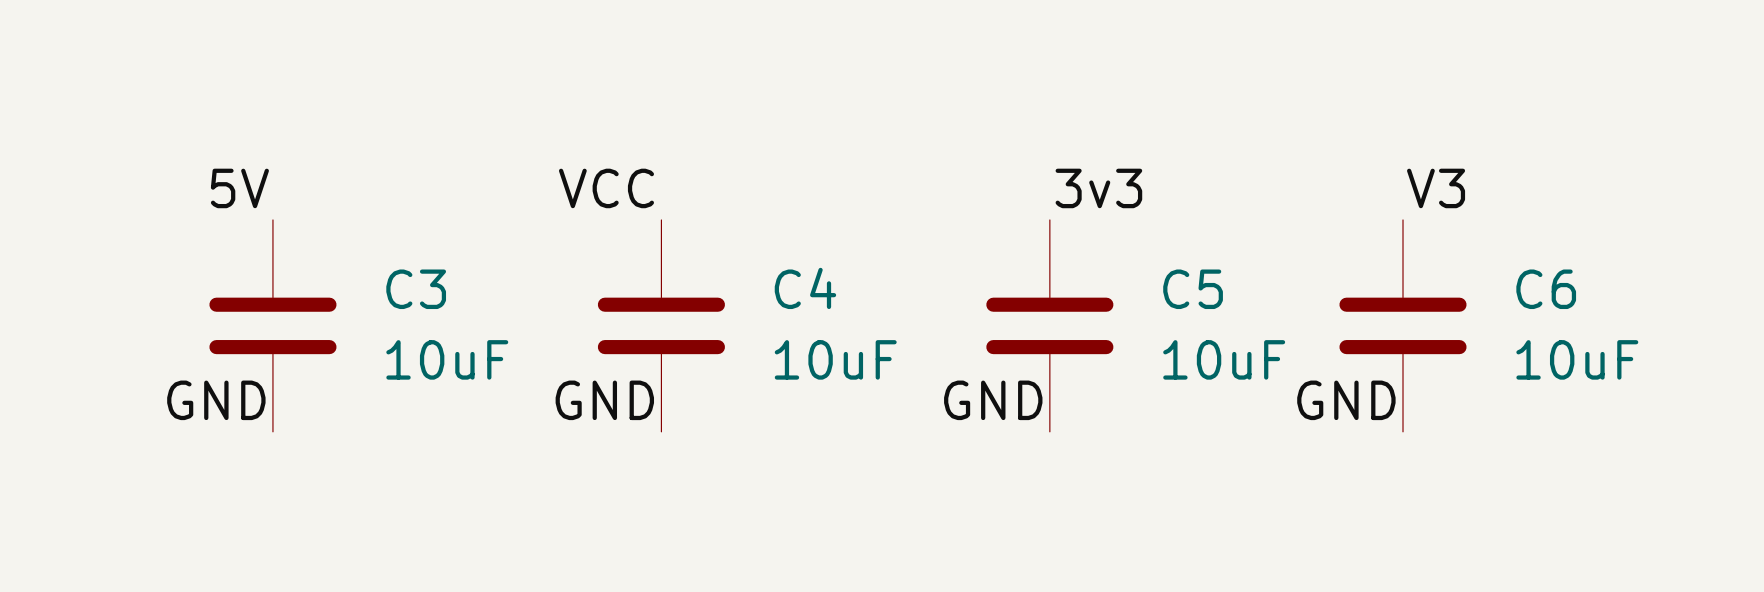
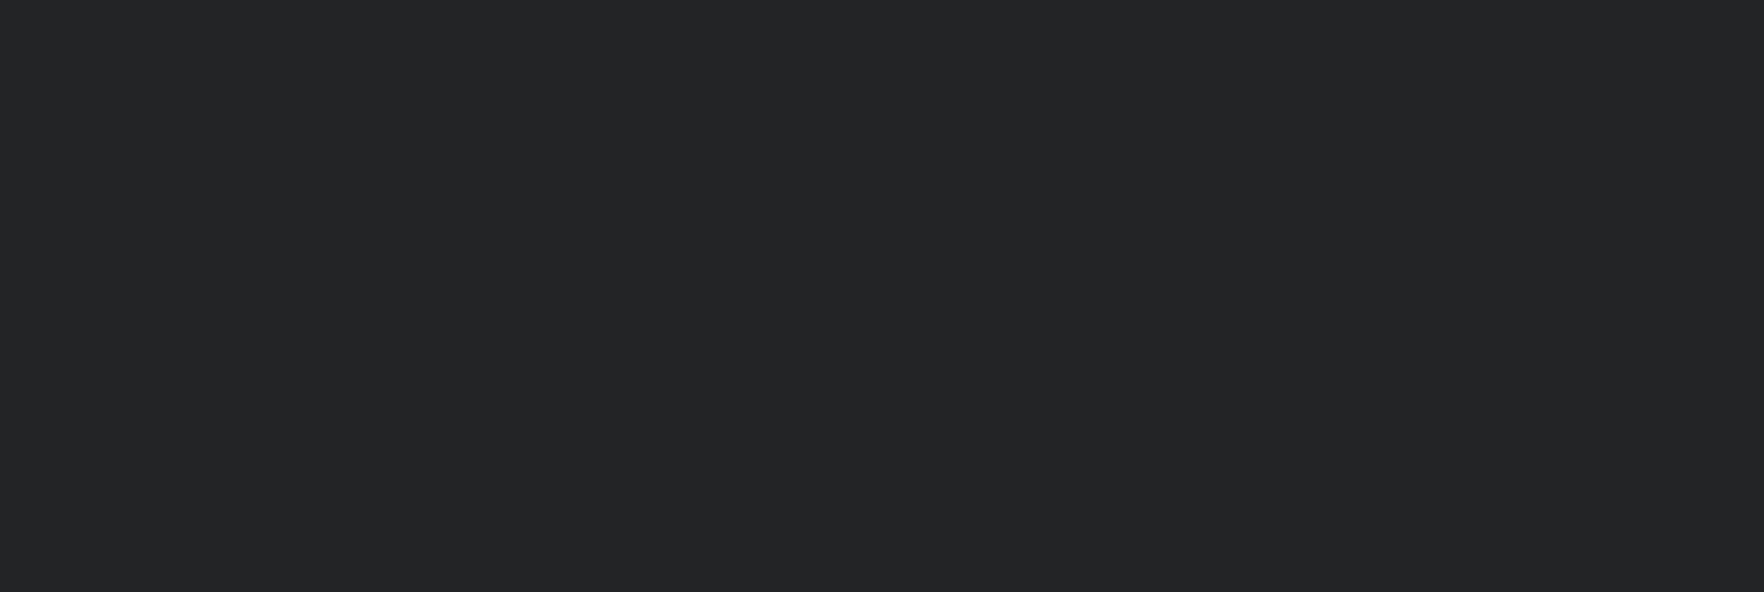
label: 5V (239, 188) -> none
label: VCC (606, 188) -> none
label: 3v3 (1098, 188) -> none
label: V3 (1436, 188) -> none
C3: 10uF (272, 325) -> none
C4: 10uF (661, 325) -> none
C5: 10uF (1049, 325) -> none
C6: 10uF (1403, 325) -> none
label: GND (216, 400) -> none
label: GND (604, 400) -> none
label: GND (993, 400) -> none
label: GND (1346, 400) -> none

